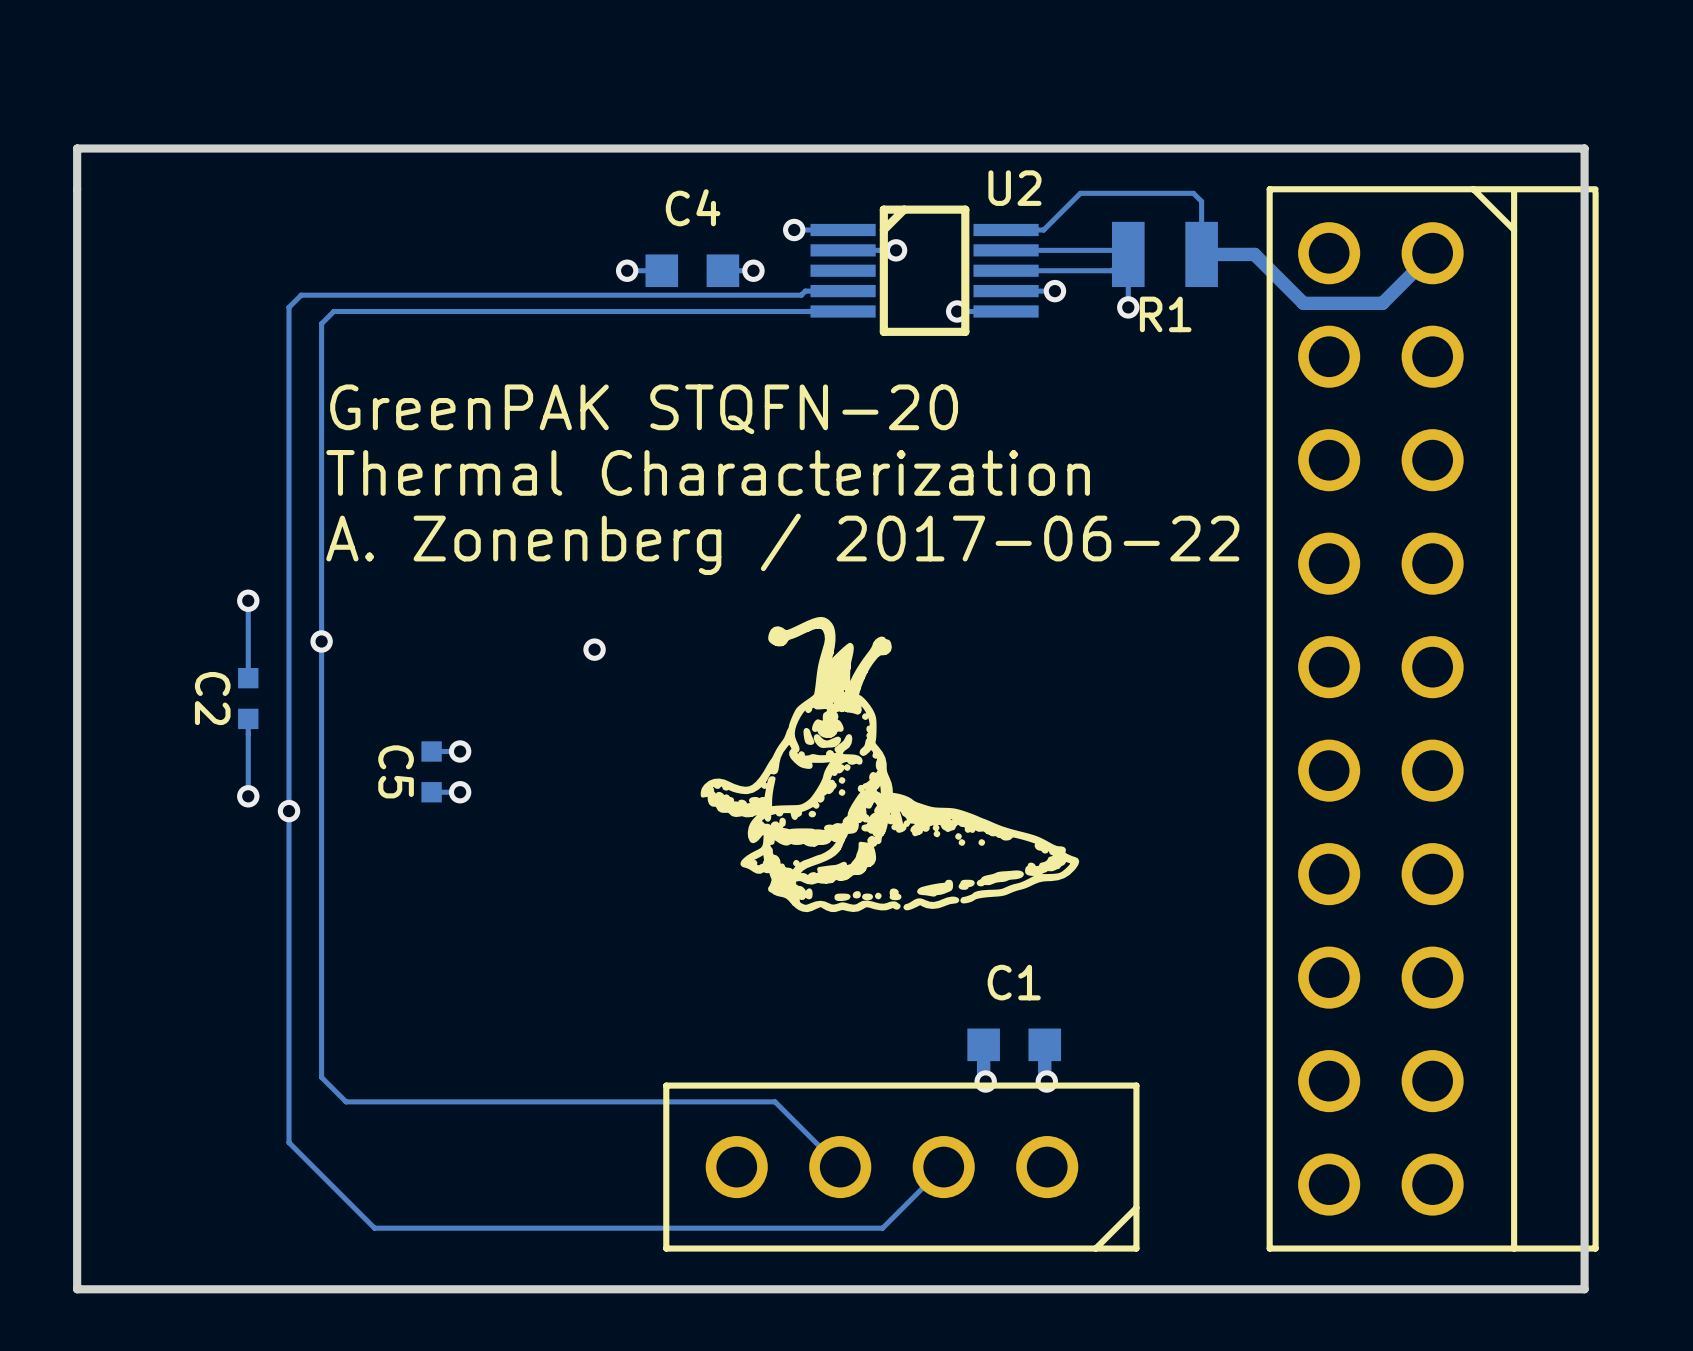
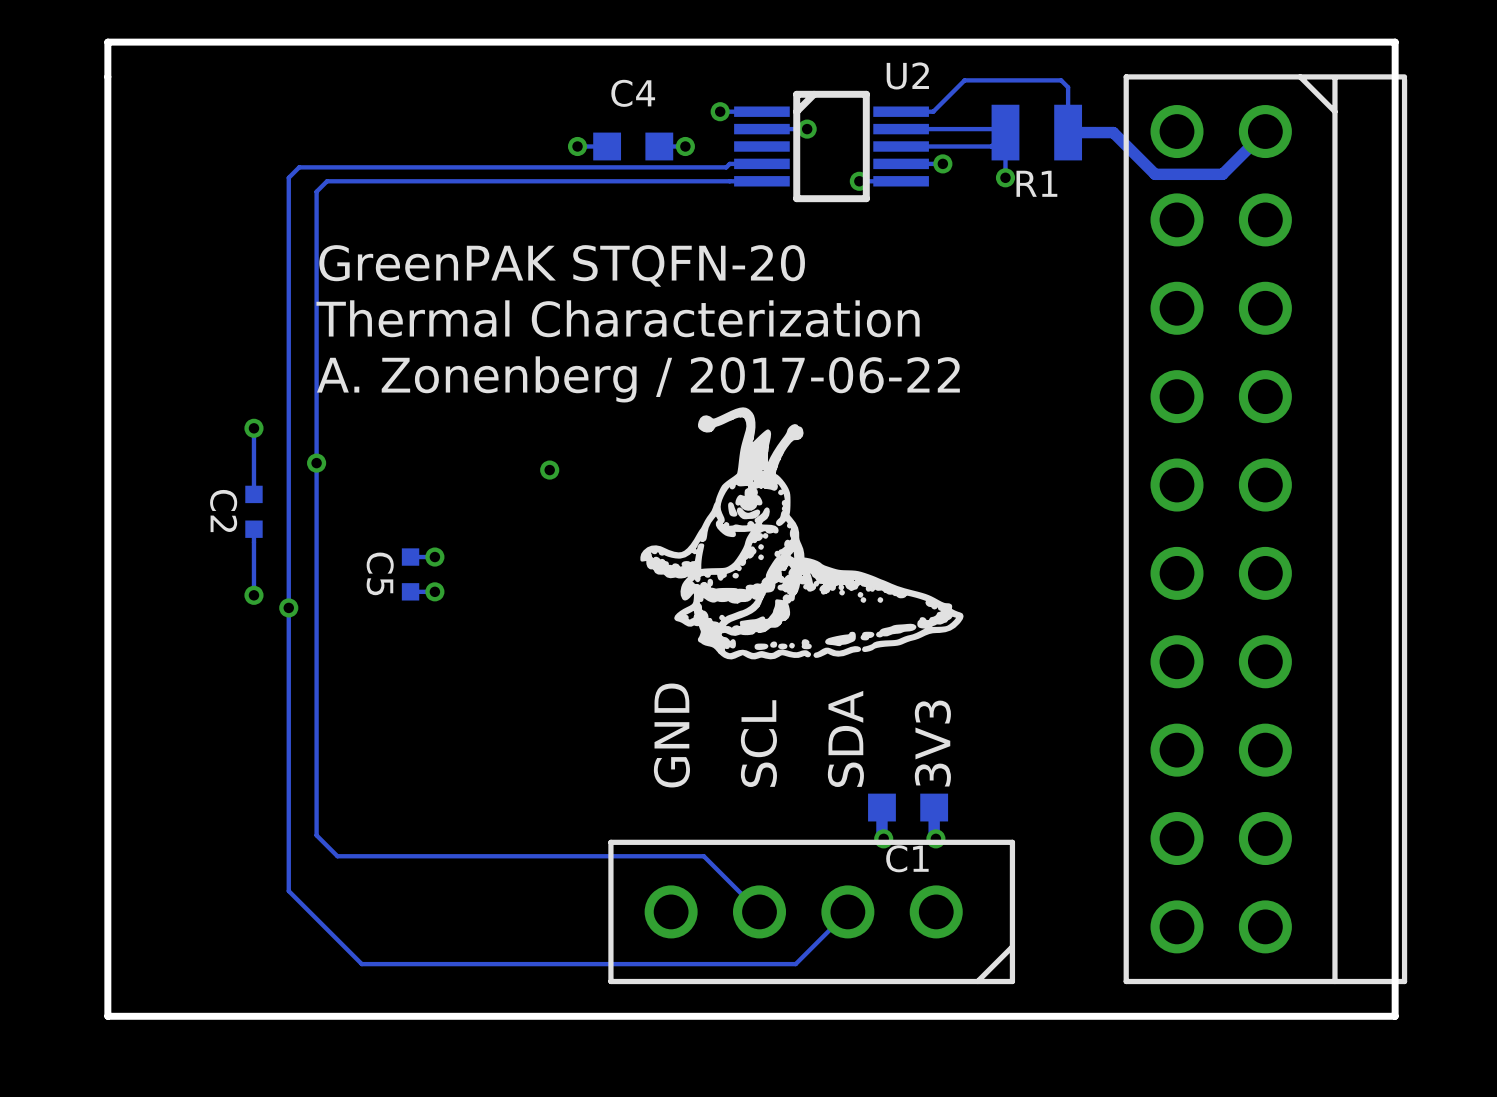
drawing position: (889, 764) -> (801, 533)
text: none -> GND (671, 735)
text: none -> SDA (845, 738)
text: none -> SCL (758, 743)
text: none -> 3V3 (932, 743)
C1 name position: C1 (1014, 982) -> C1 (907, 858)

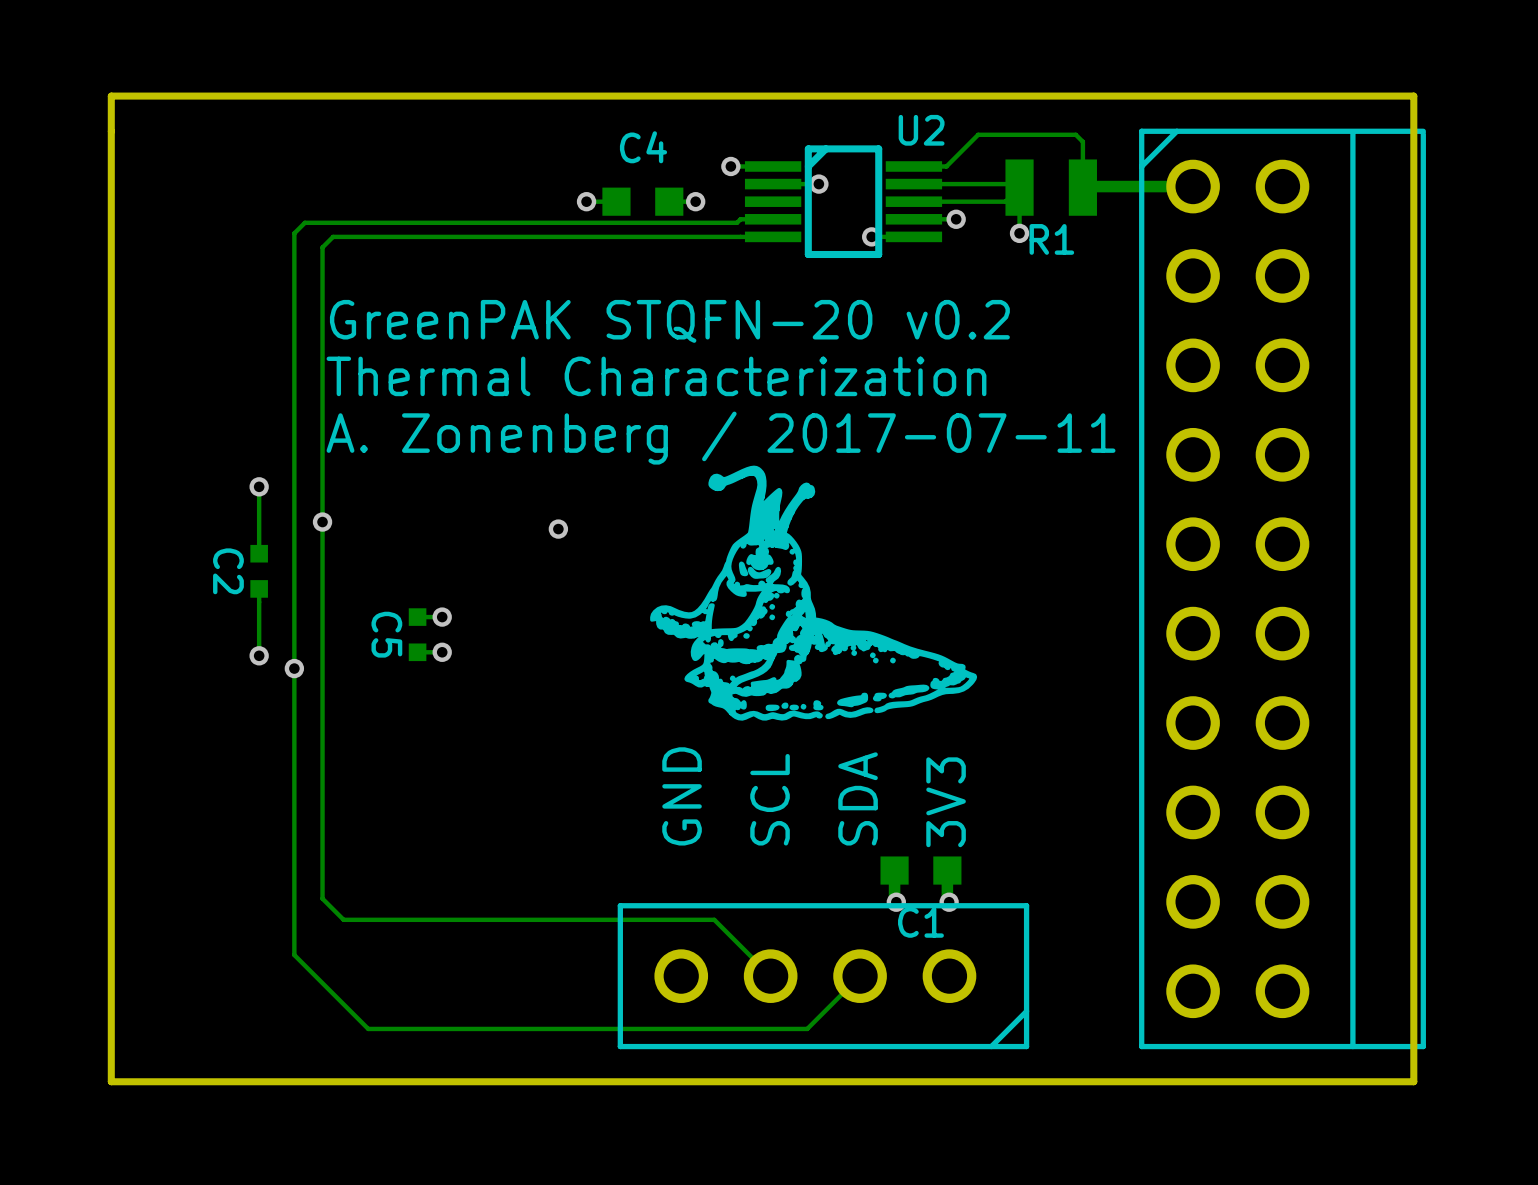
part footprint: [1123, 74, 1408, 985] -> [1139, 128, 1426, 1050]
track: (1265, 131) (1222, 174) (1155, 174) (1113, 132) (1068, 132) -> (1193, 186) (1082, 187)
text: GreenPAK STQFN-20 (562, 265) -> GreenPAK STQFN-20 v0.2 (669, 321)
text: A. Zonenberg / 2017-06-22 (638, 379) -> A. Zonenberg / 2017-07-11 (721, 438)

